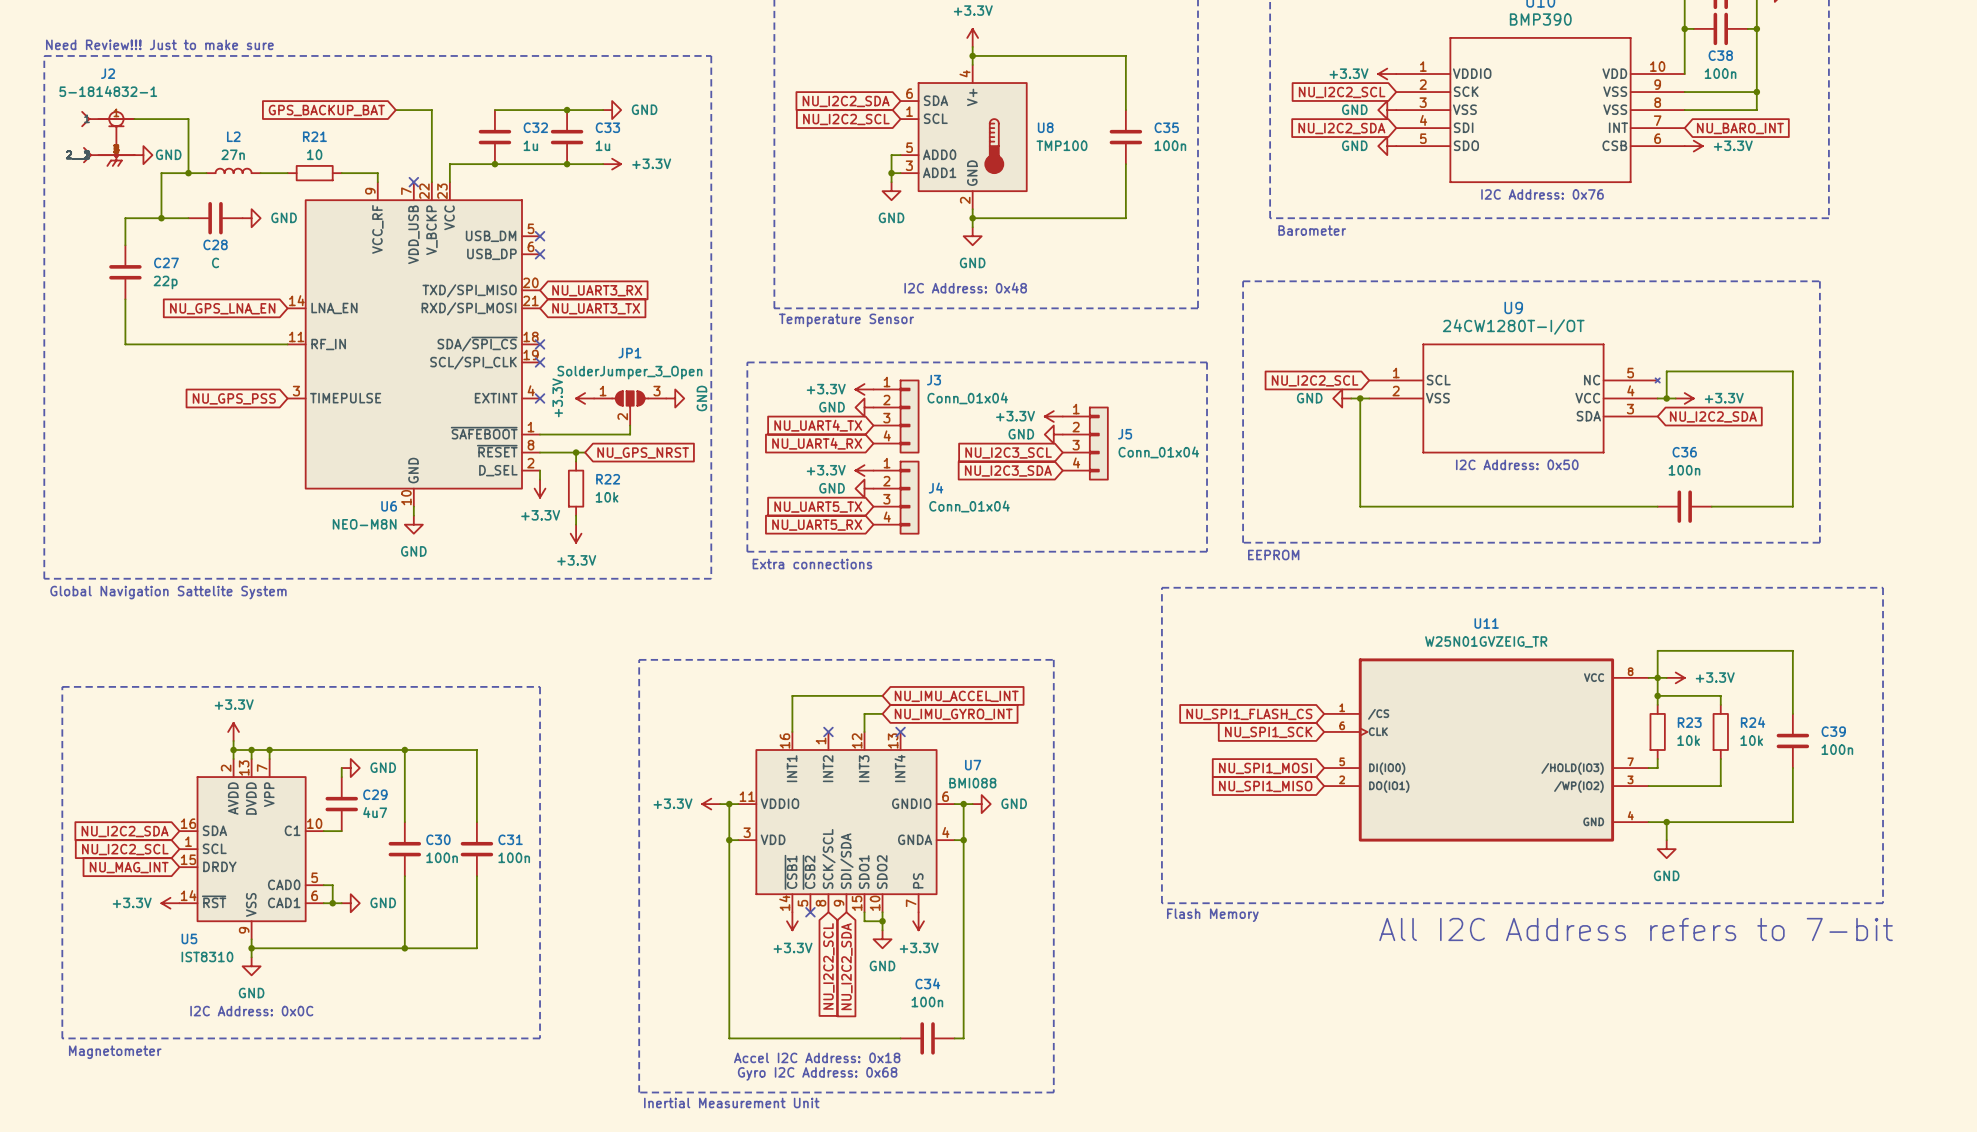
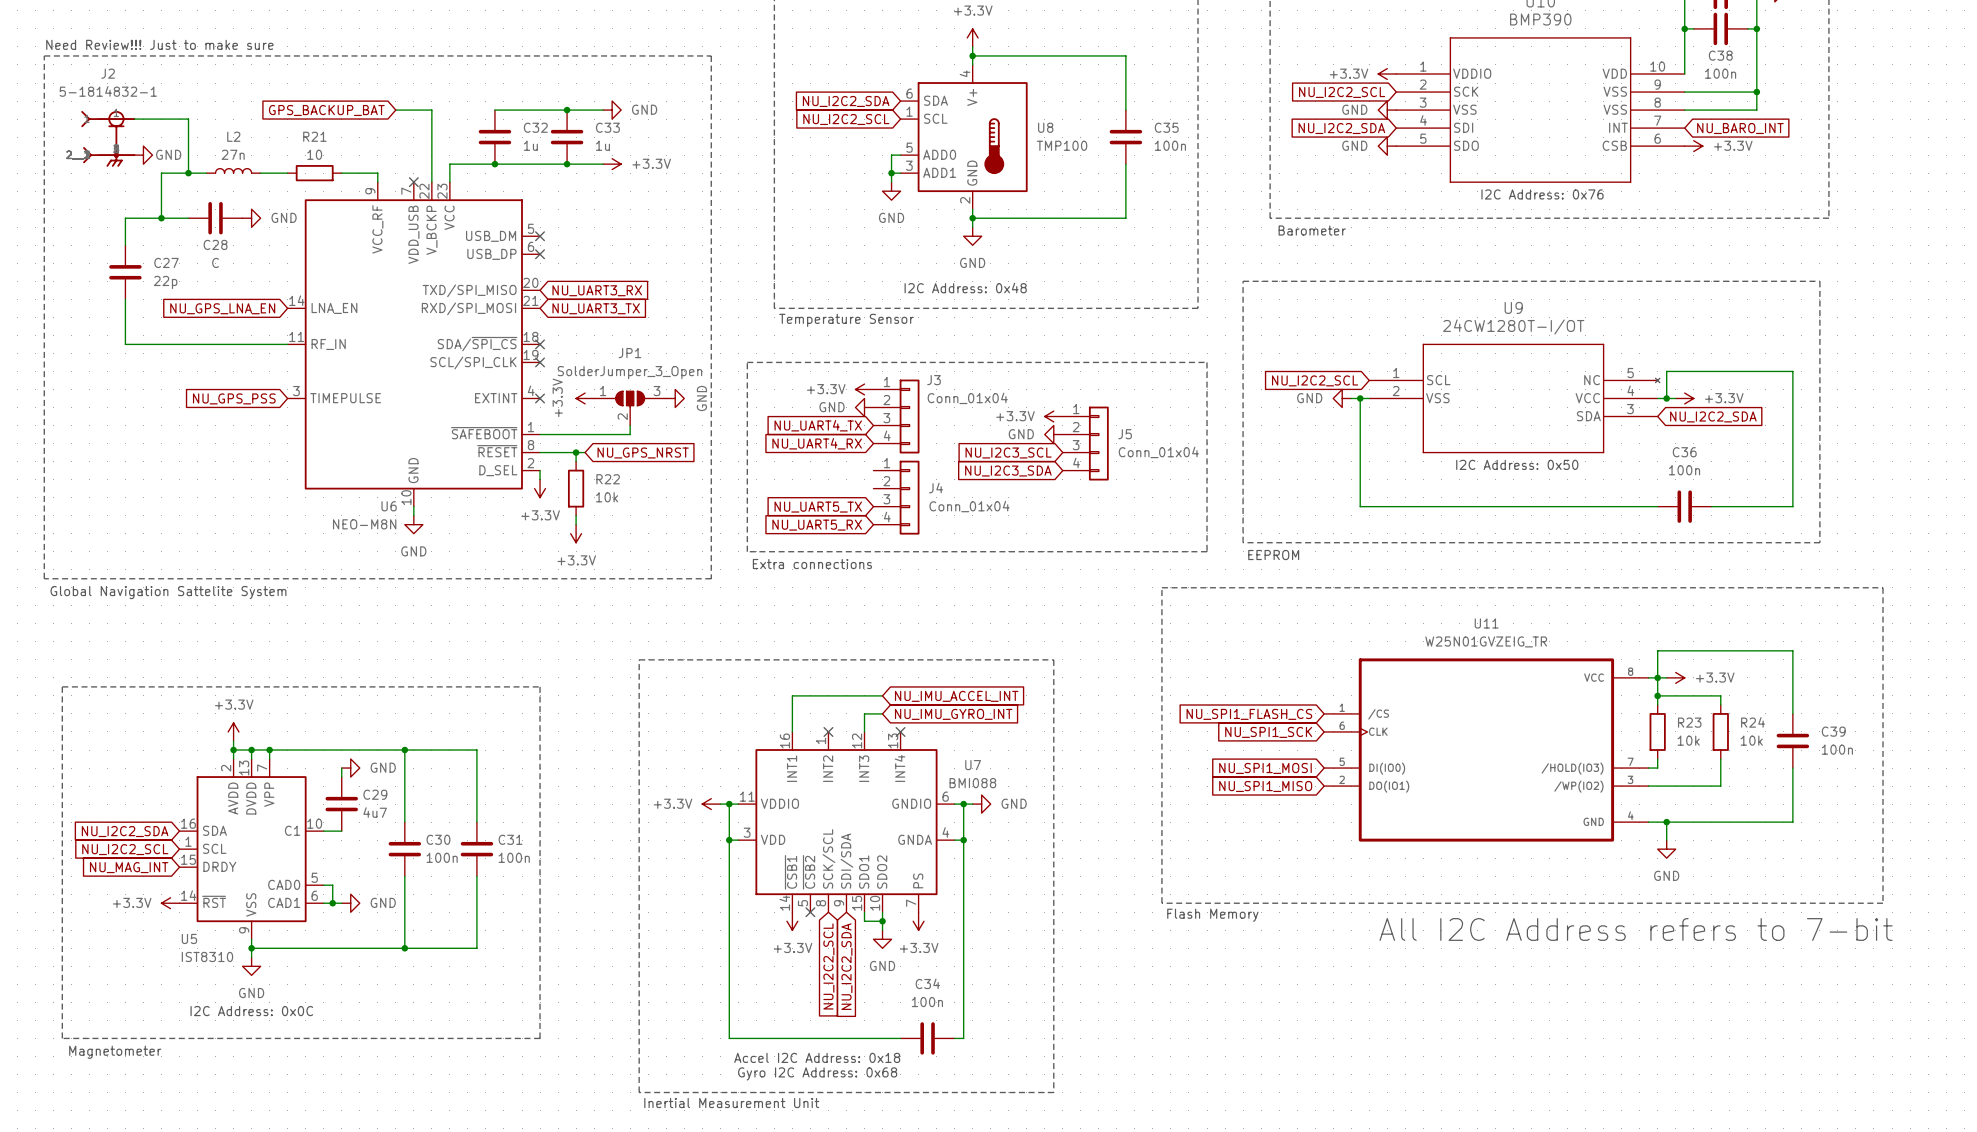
power symbol: +3.3V (864, 470) -> none
power symbol: GND (864, 488) -> none

